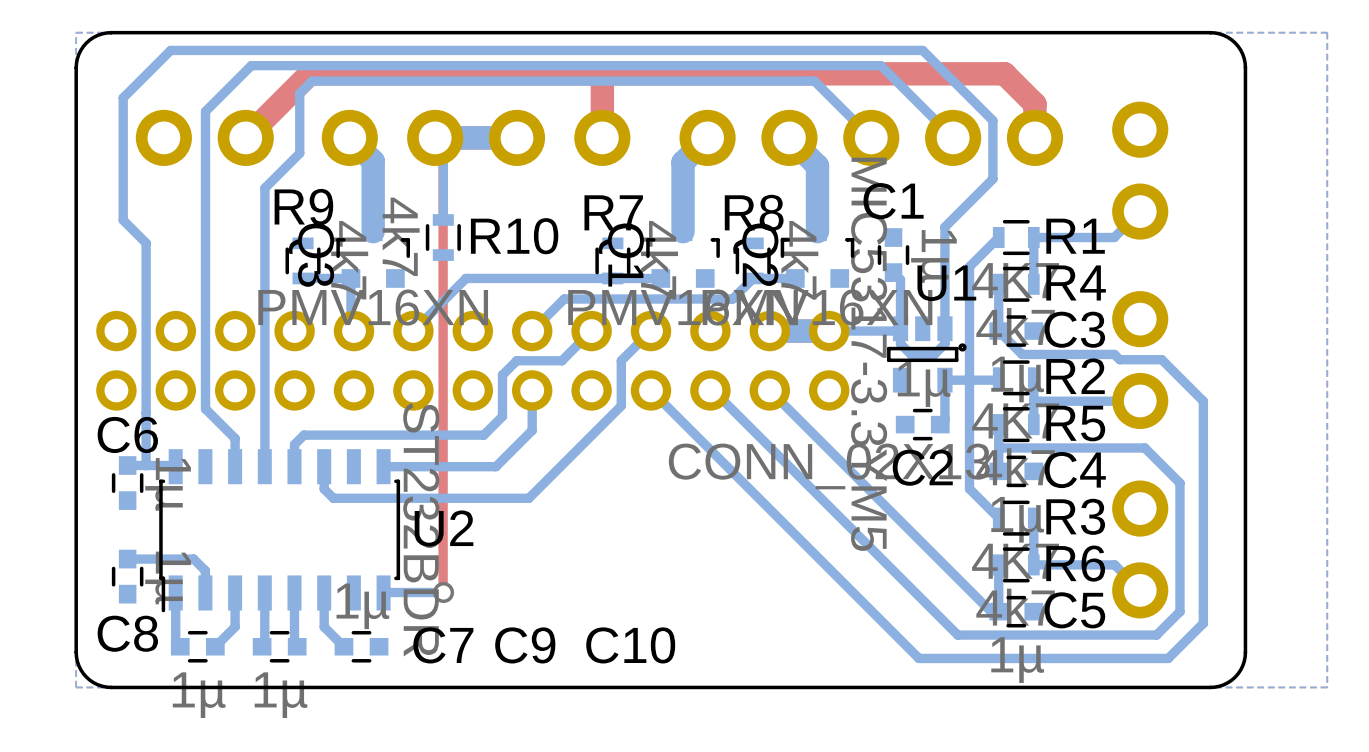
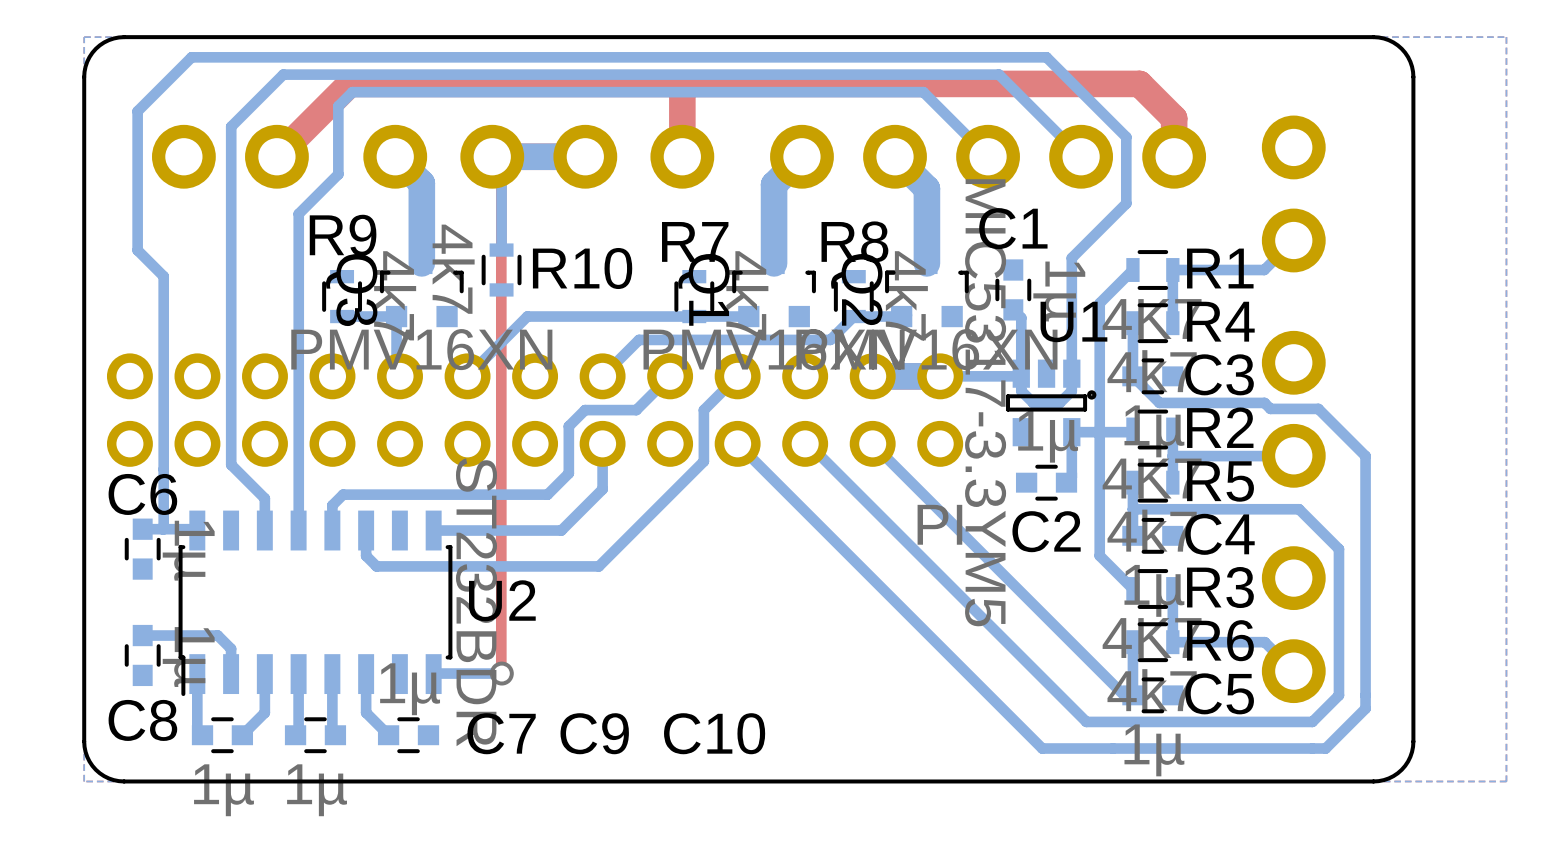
part value: CONN_02X13 (829, 466) -> PI (939, 524)

